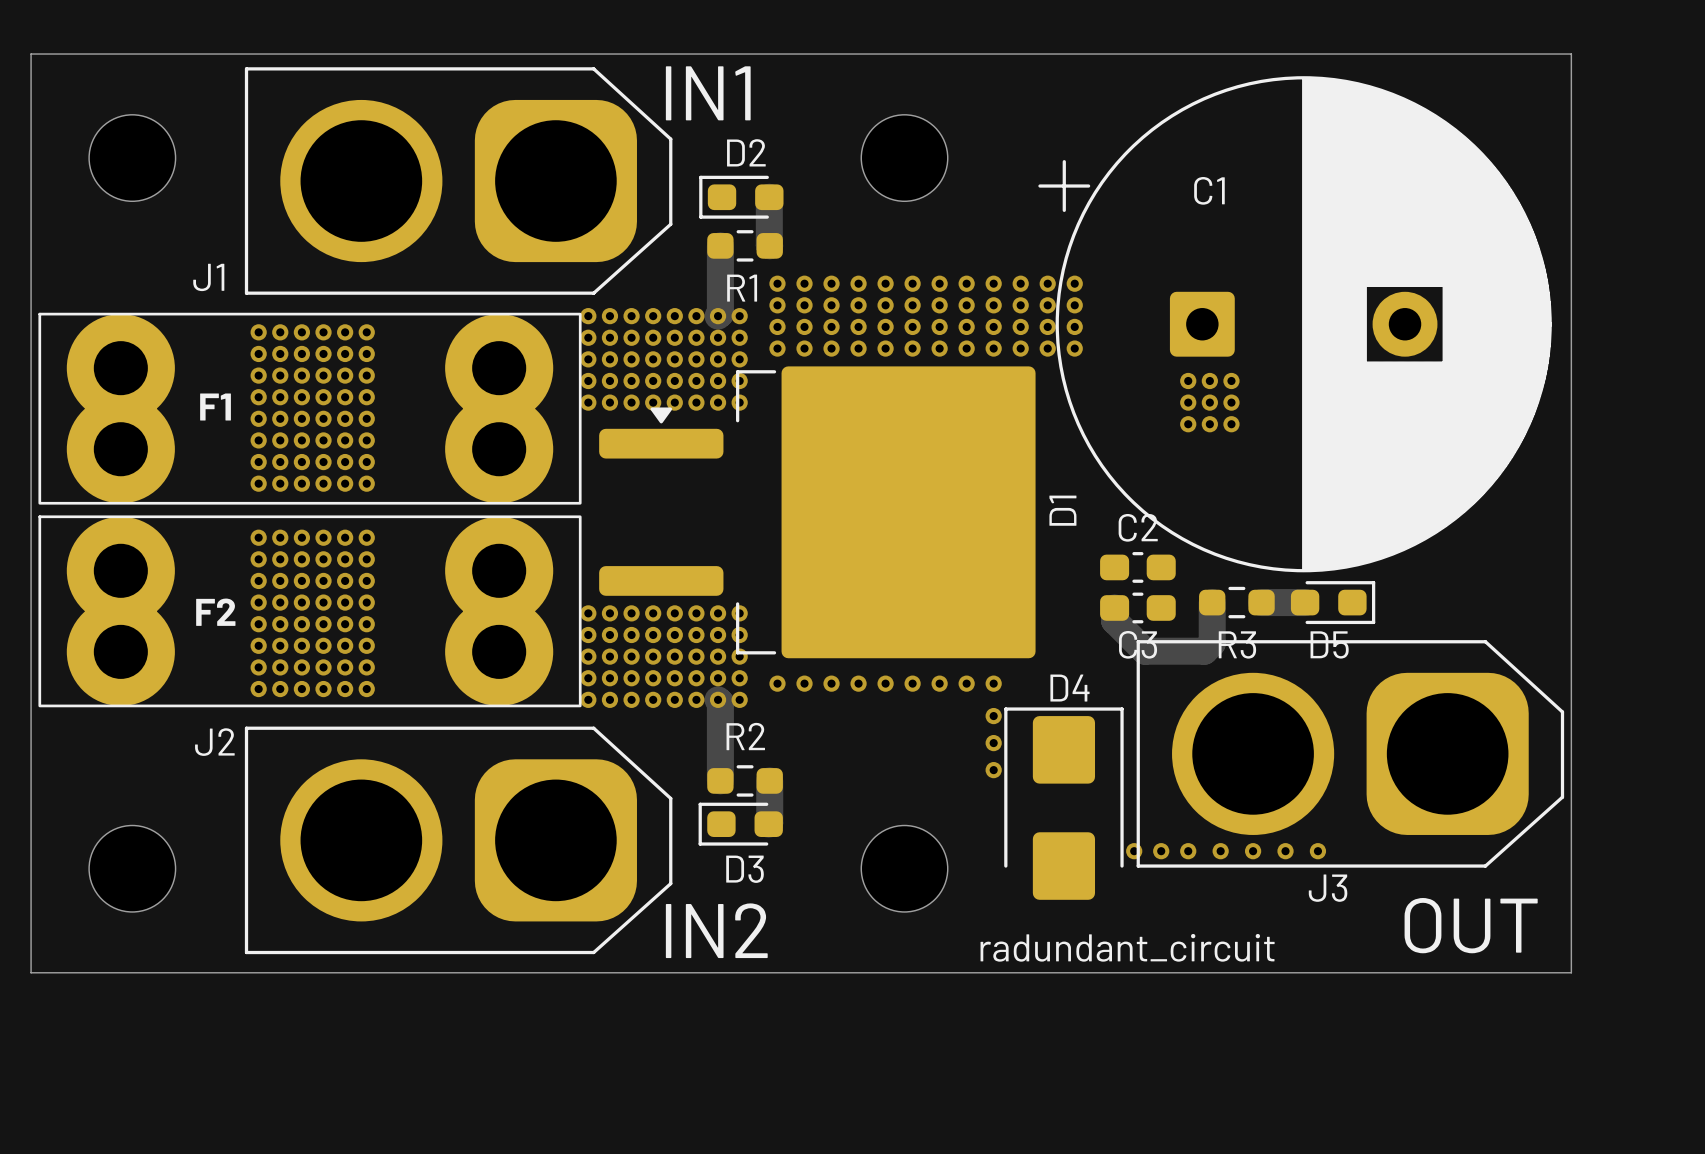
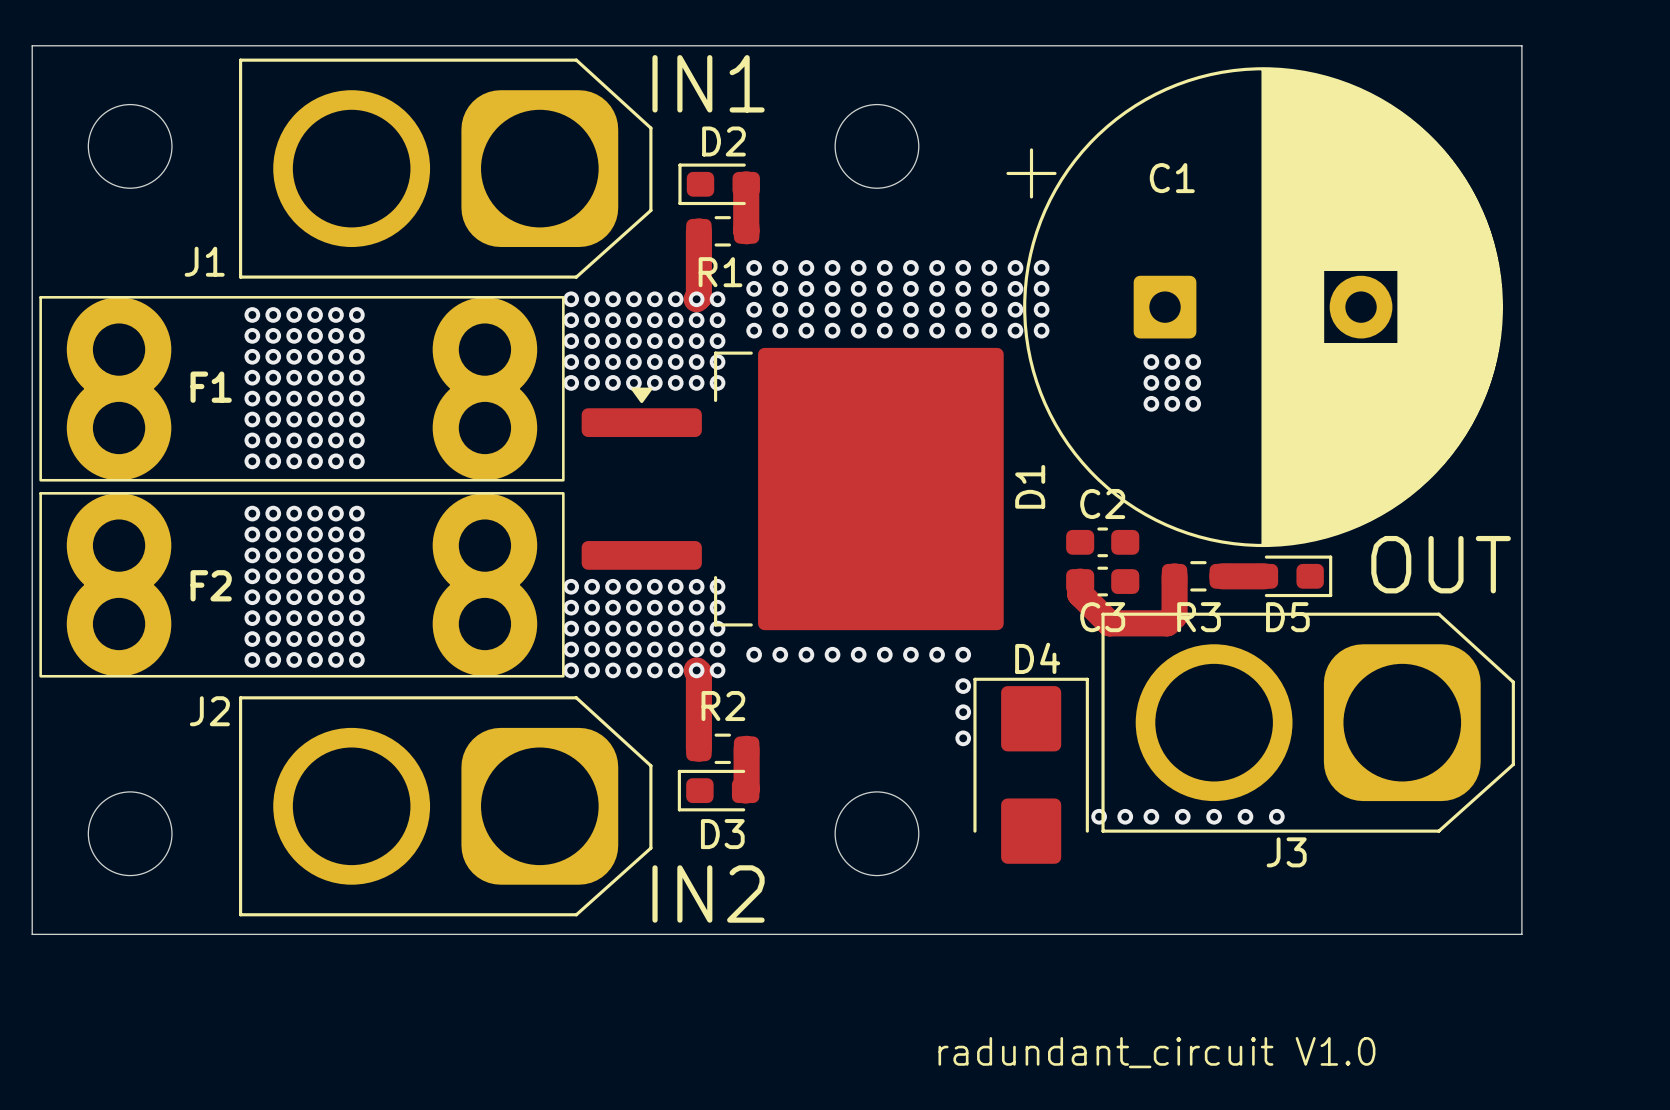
text position: OUT (1471, 925) -> OUT (1441, 564)
text: radundant_circuit (1127, 947) -> none
text: none -> radundant_circuit V1.0 (1156, 1052)

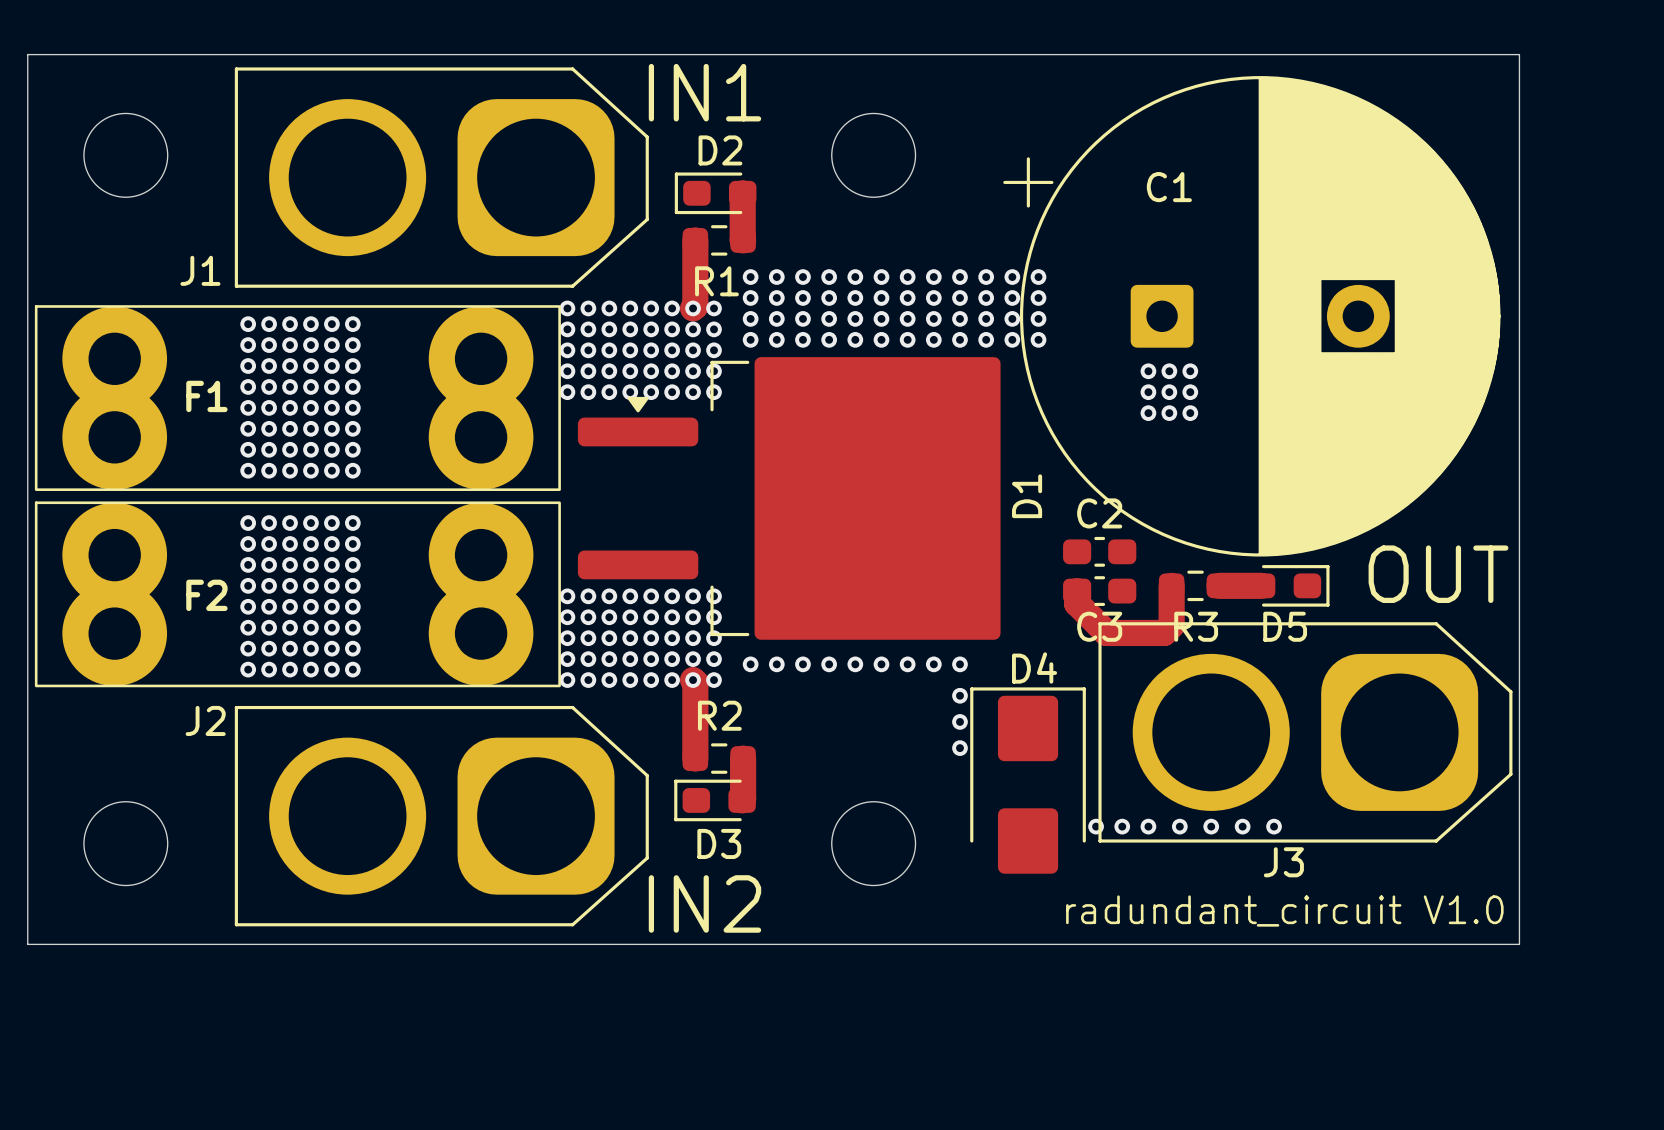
text position: radundant_circuit V1.0 (1156, 1052) -> radundant_circuit V1.0 (1284, 911)

